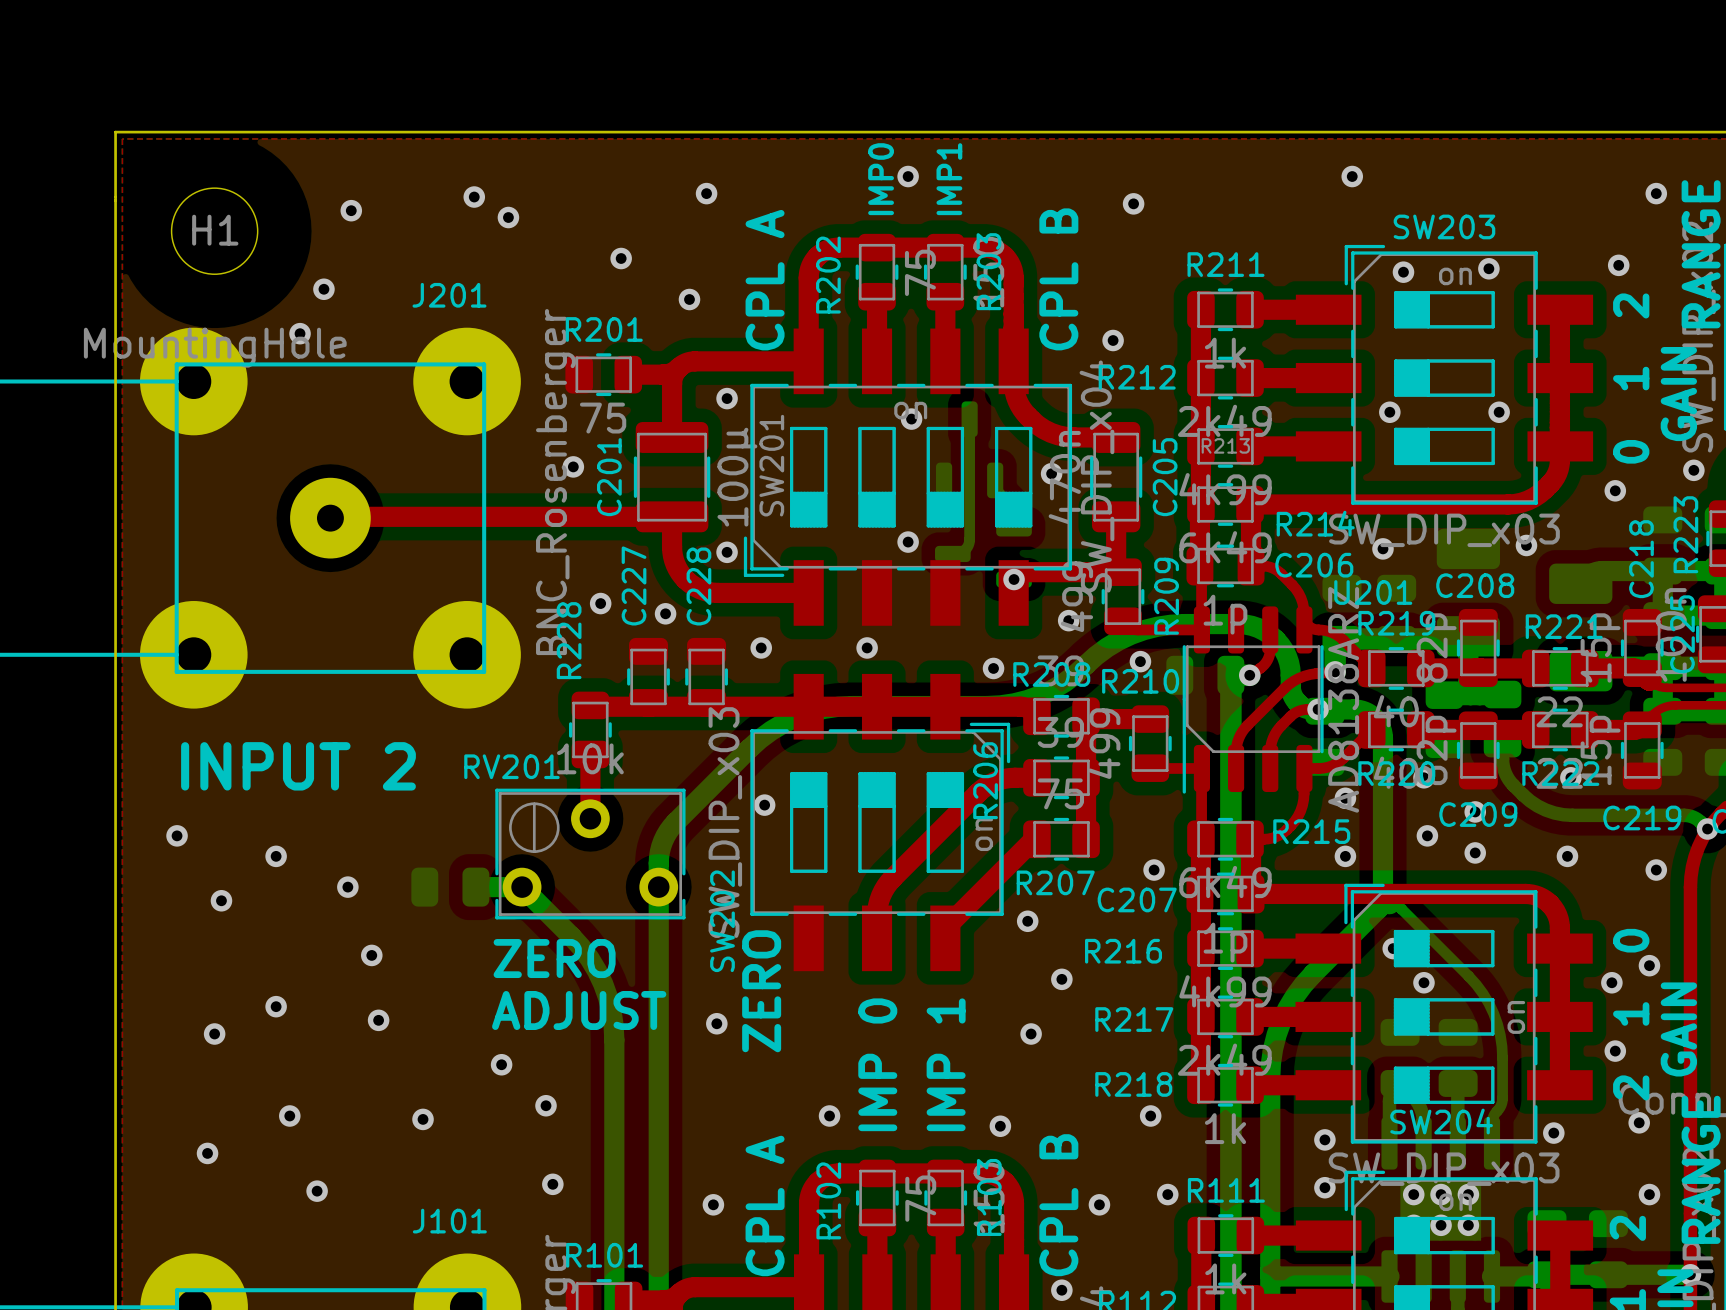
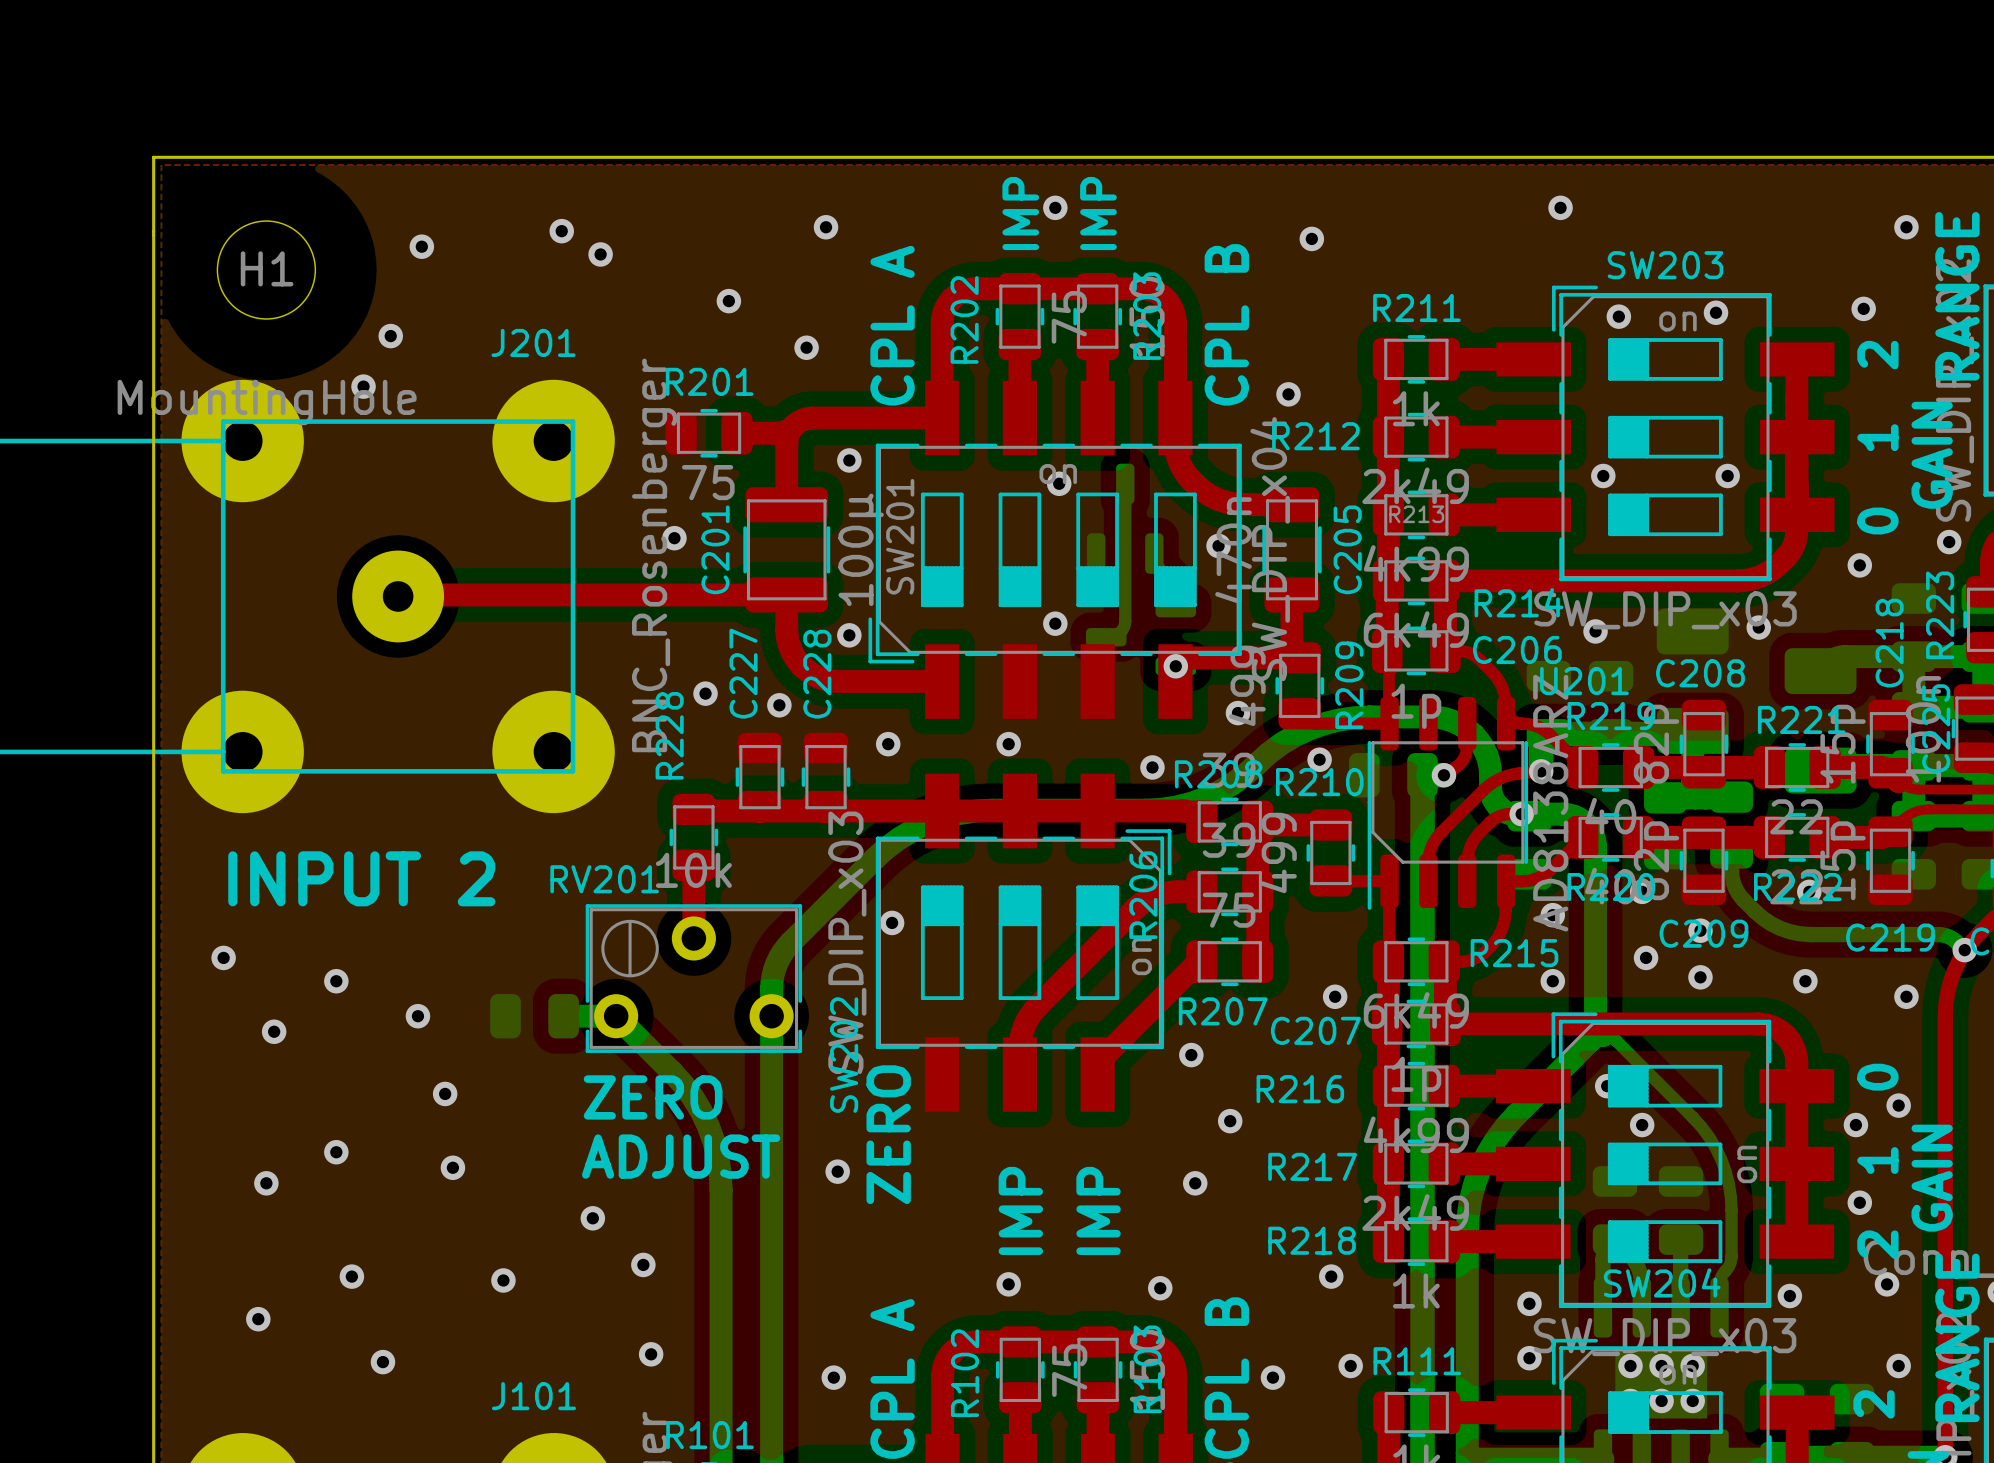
text: IMP0 (881, 179) -> IMP (1020, 213)
text: IMP1 (949, 179) -> IMP (1098, 213)
text: IMP 0 (877, 1064) -> IMP (1020, 1210)
text: IMP 1 (946, 1064) -> IMP (1098, 1210)
via position: (829, 1115) -> (1008, 1284)

